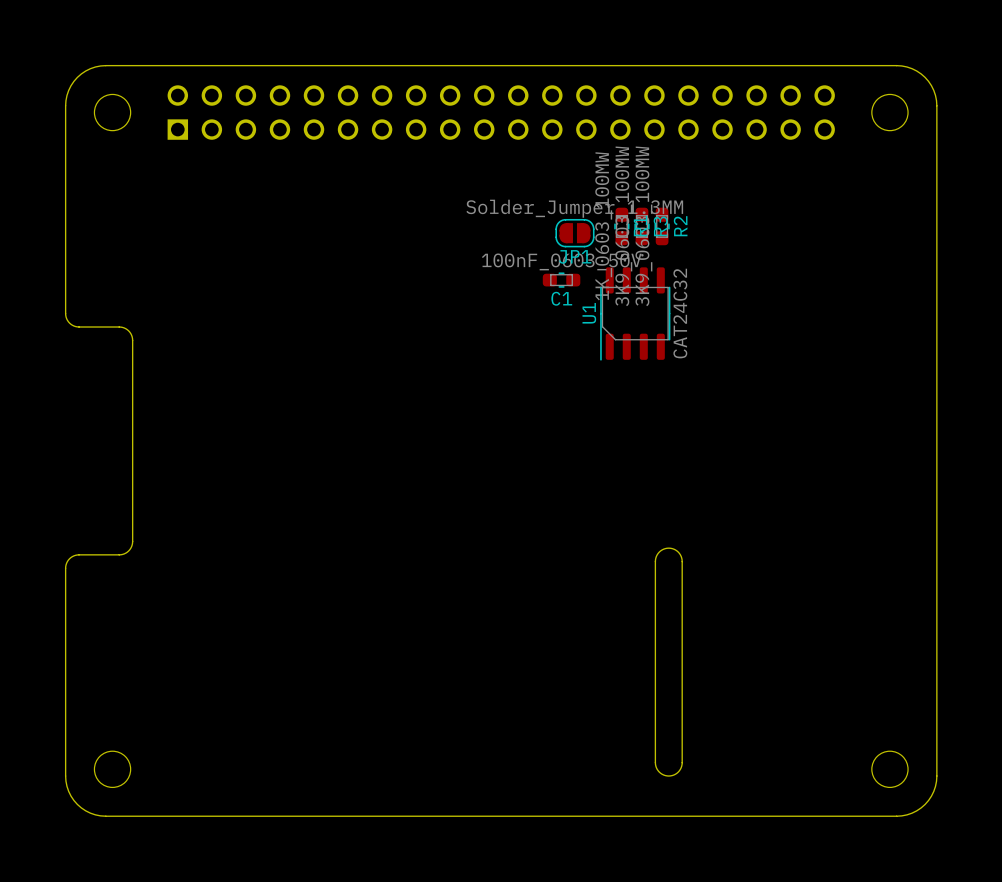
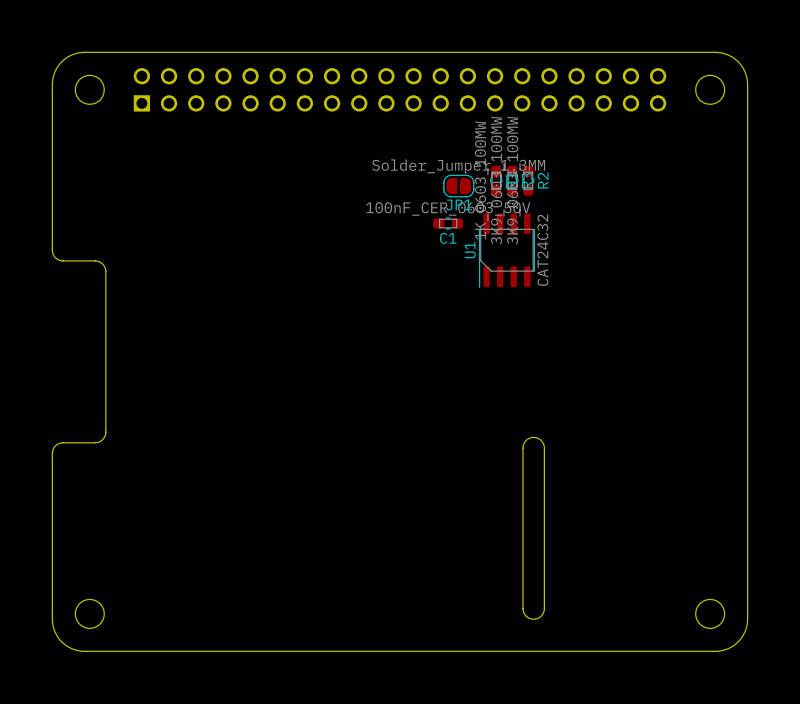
C1 value: 100nF_0603_50V (561, 261) -> 100nF_CER_0603_50V (448, 209)

